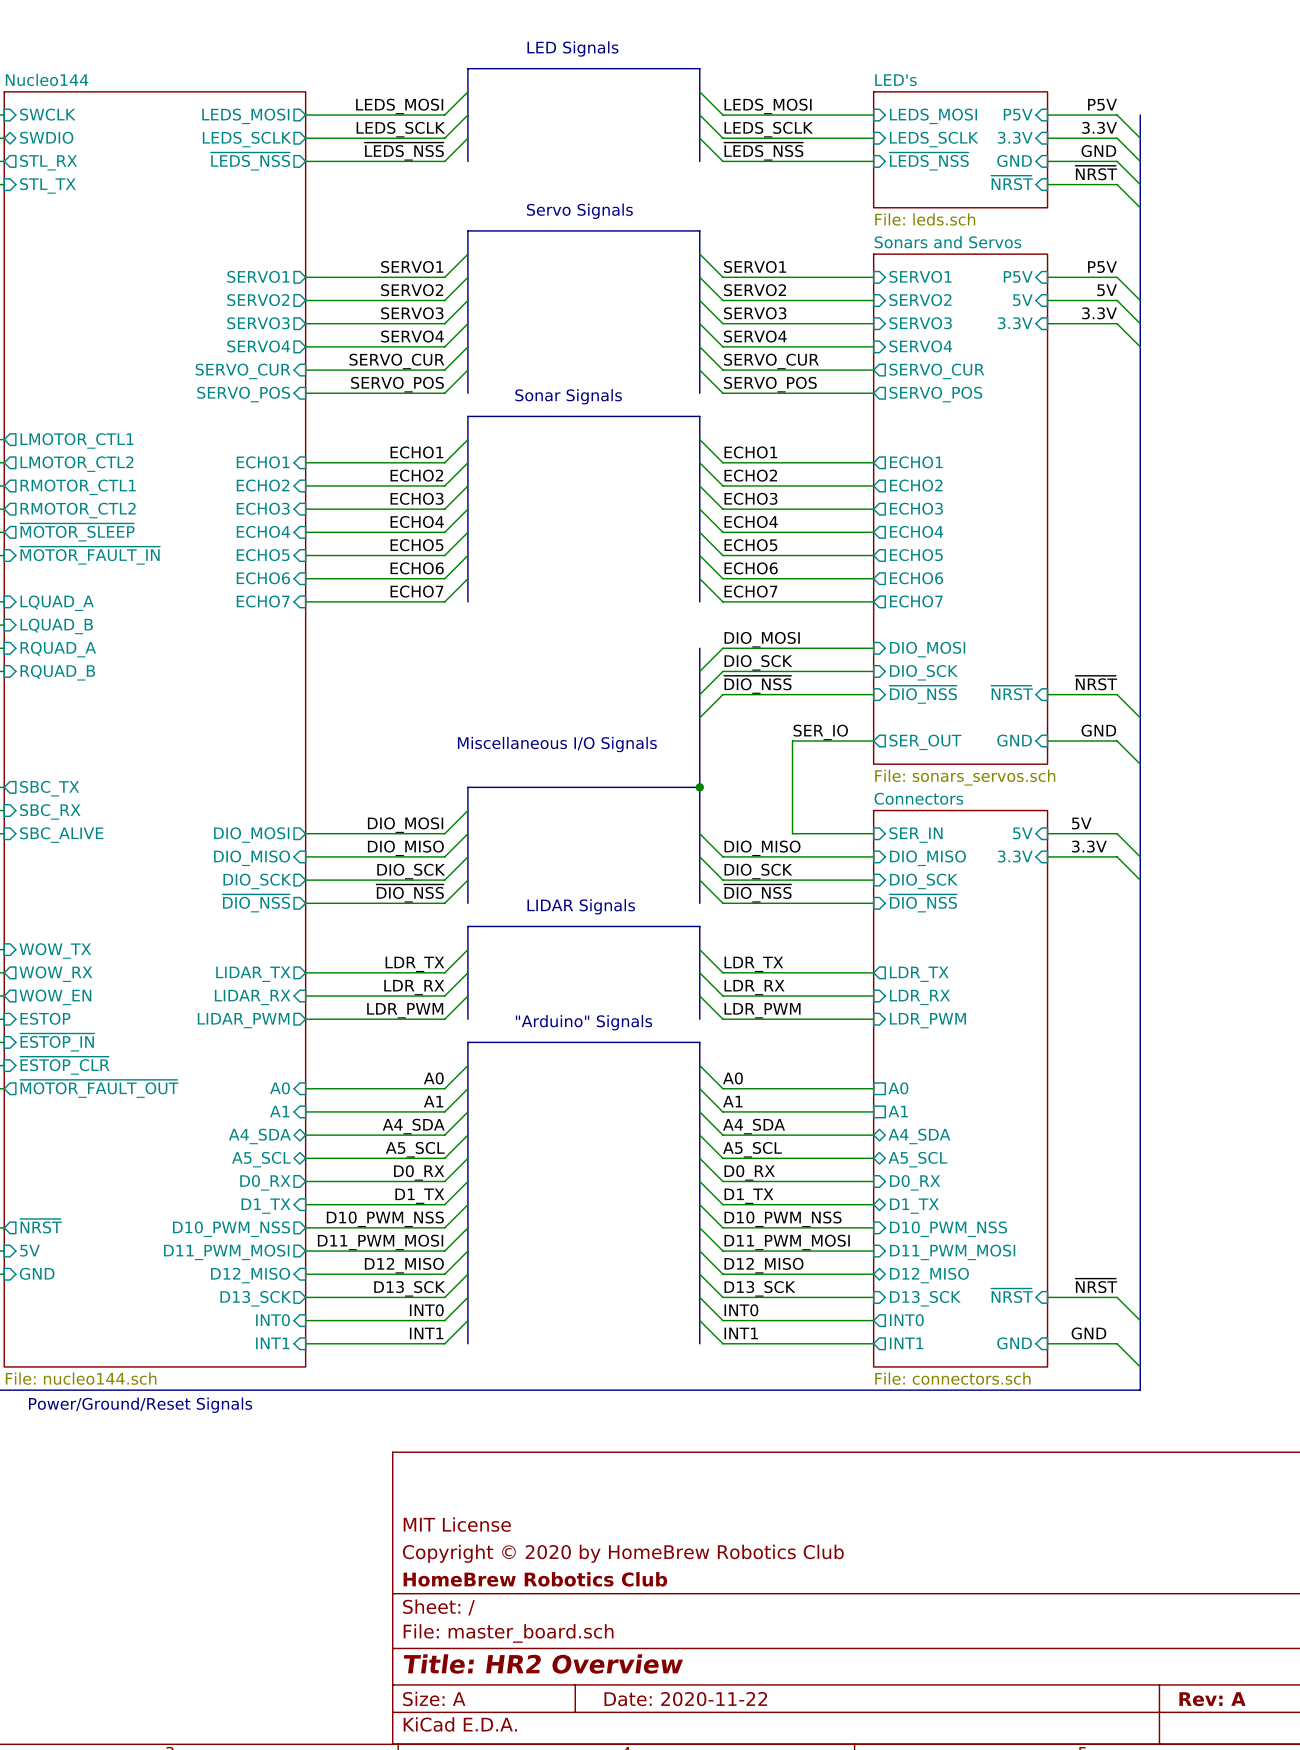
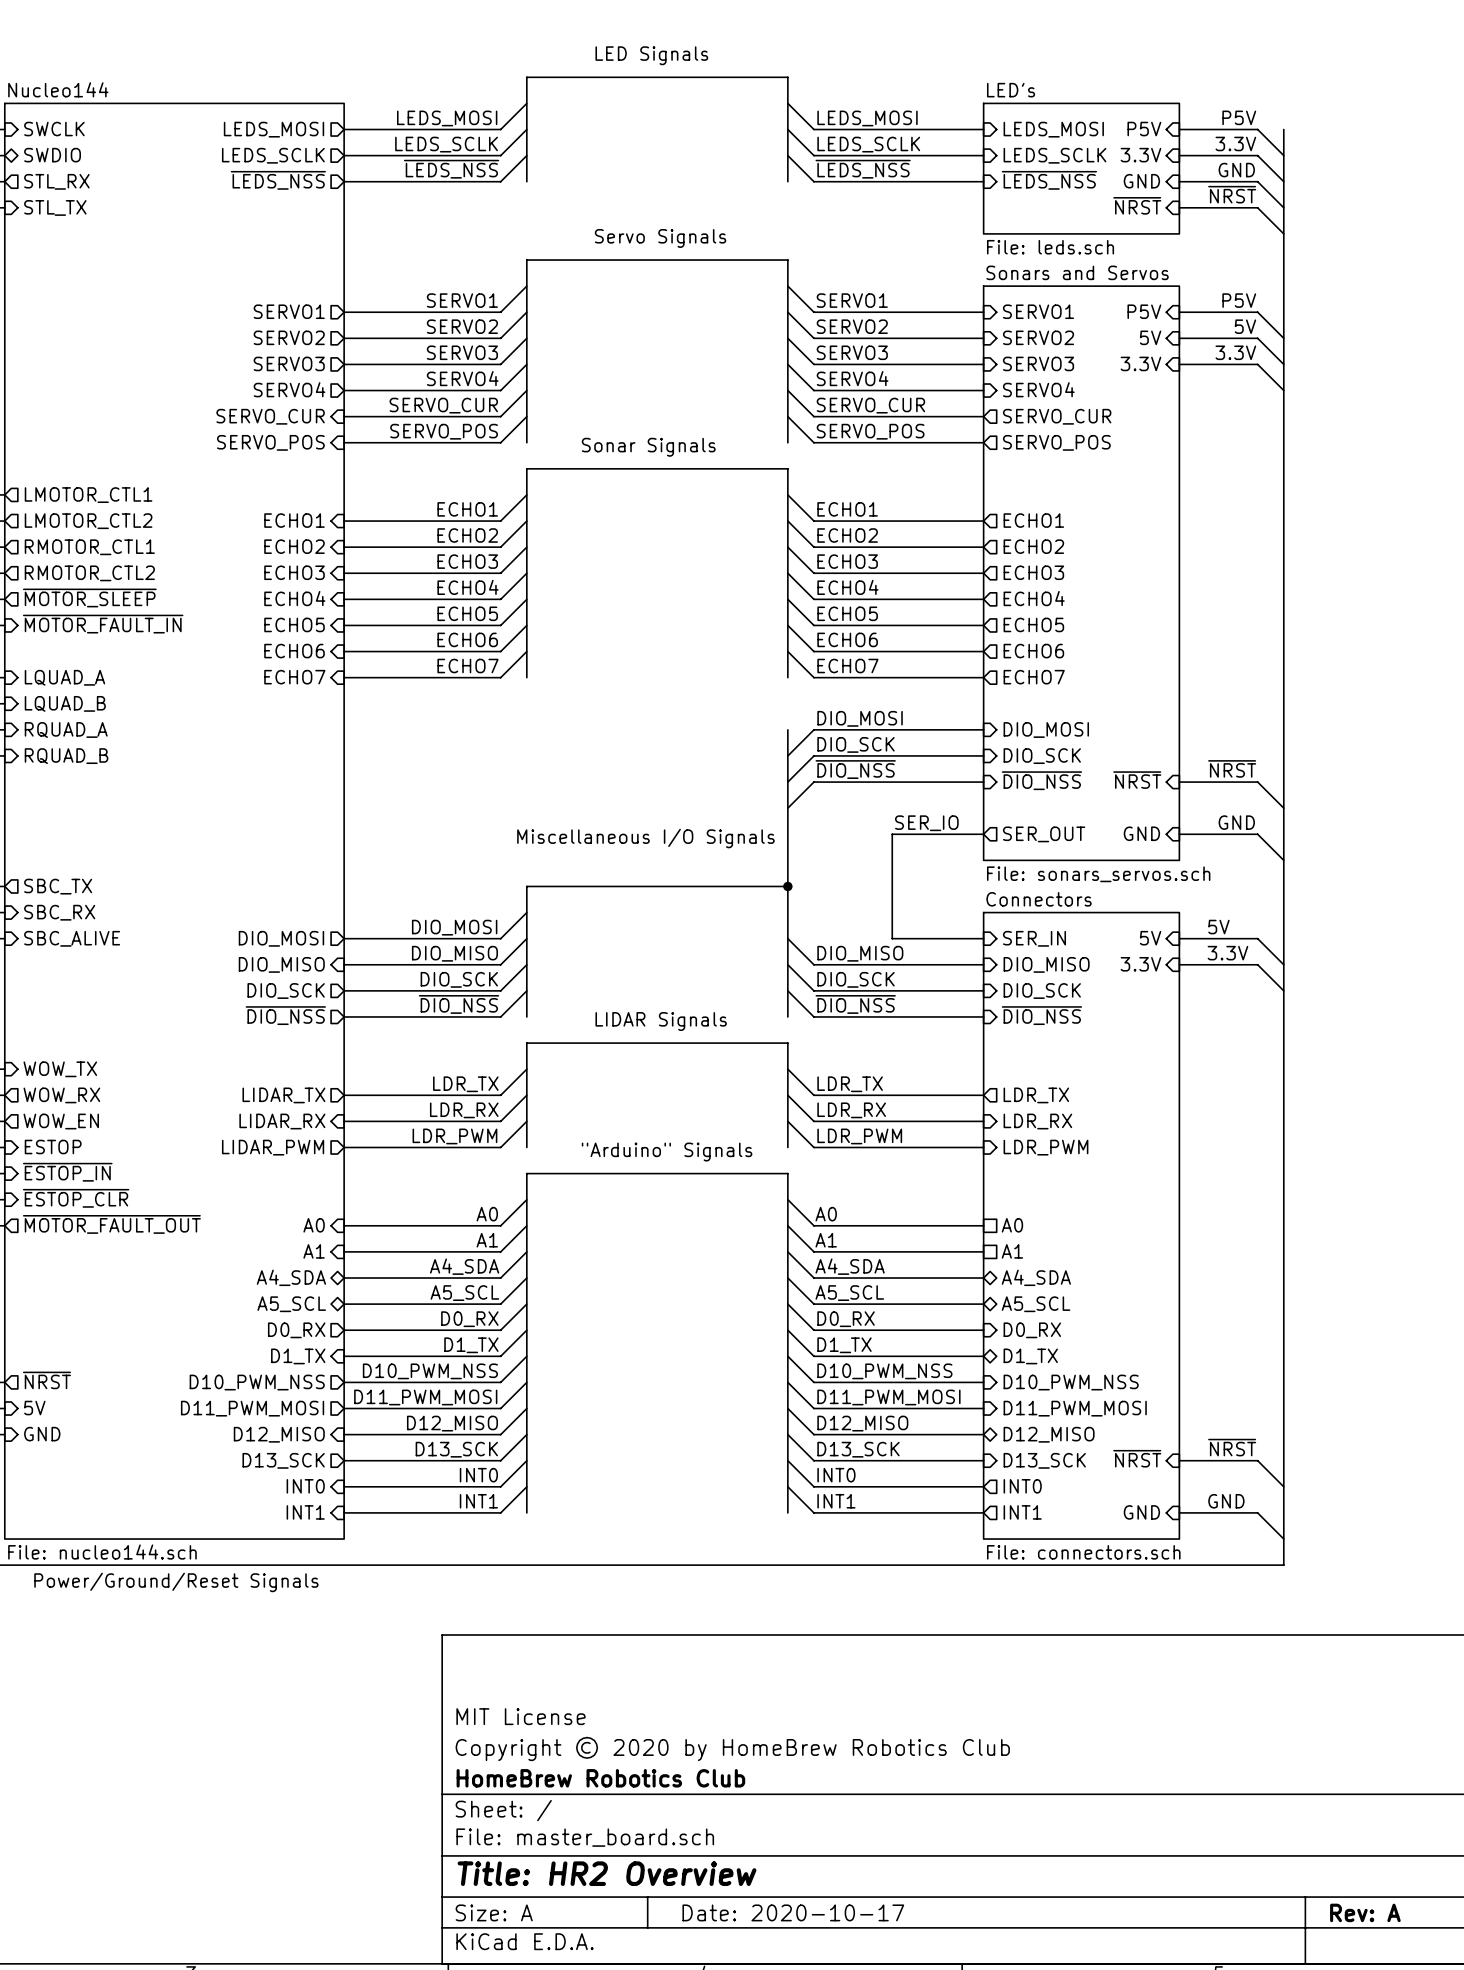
title block: Date: 2020-11-22 (685, 1699) -> Date: 2020-10-17 (793, 1912)

